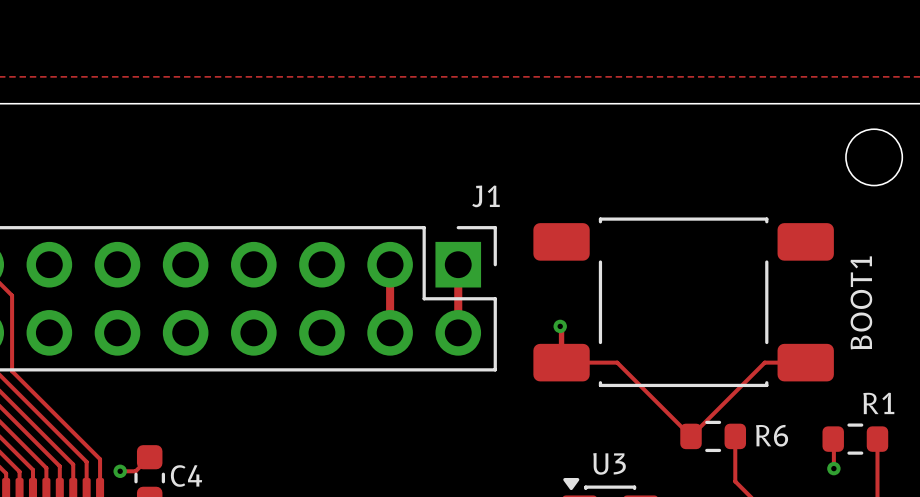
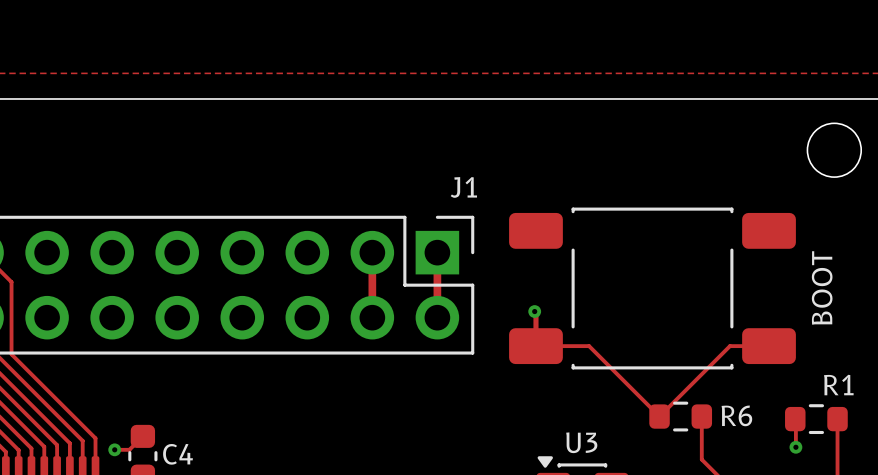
BOOT1 name: BOOT1 (861, 302) -> BOOT (822, 287)

